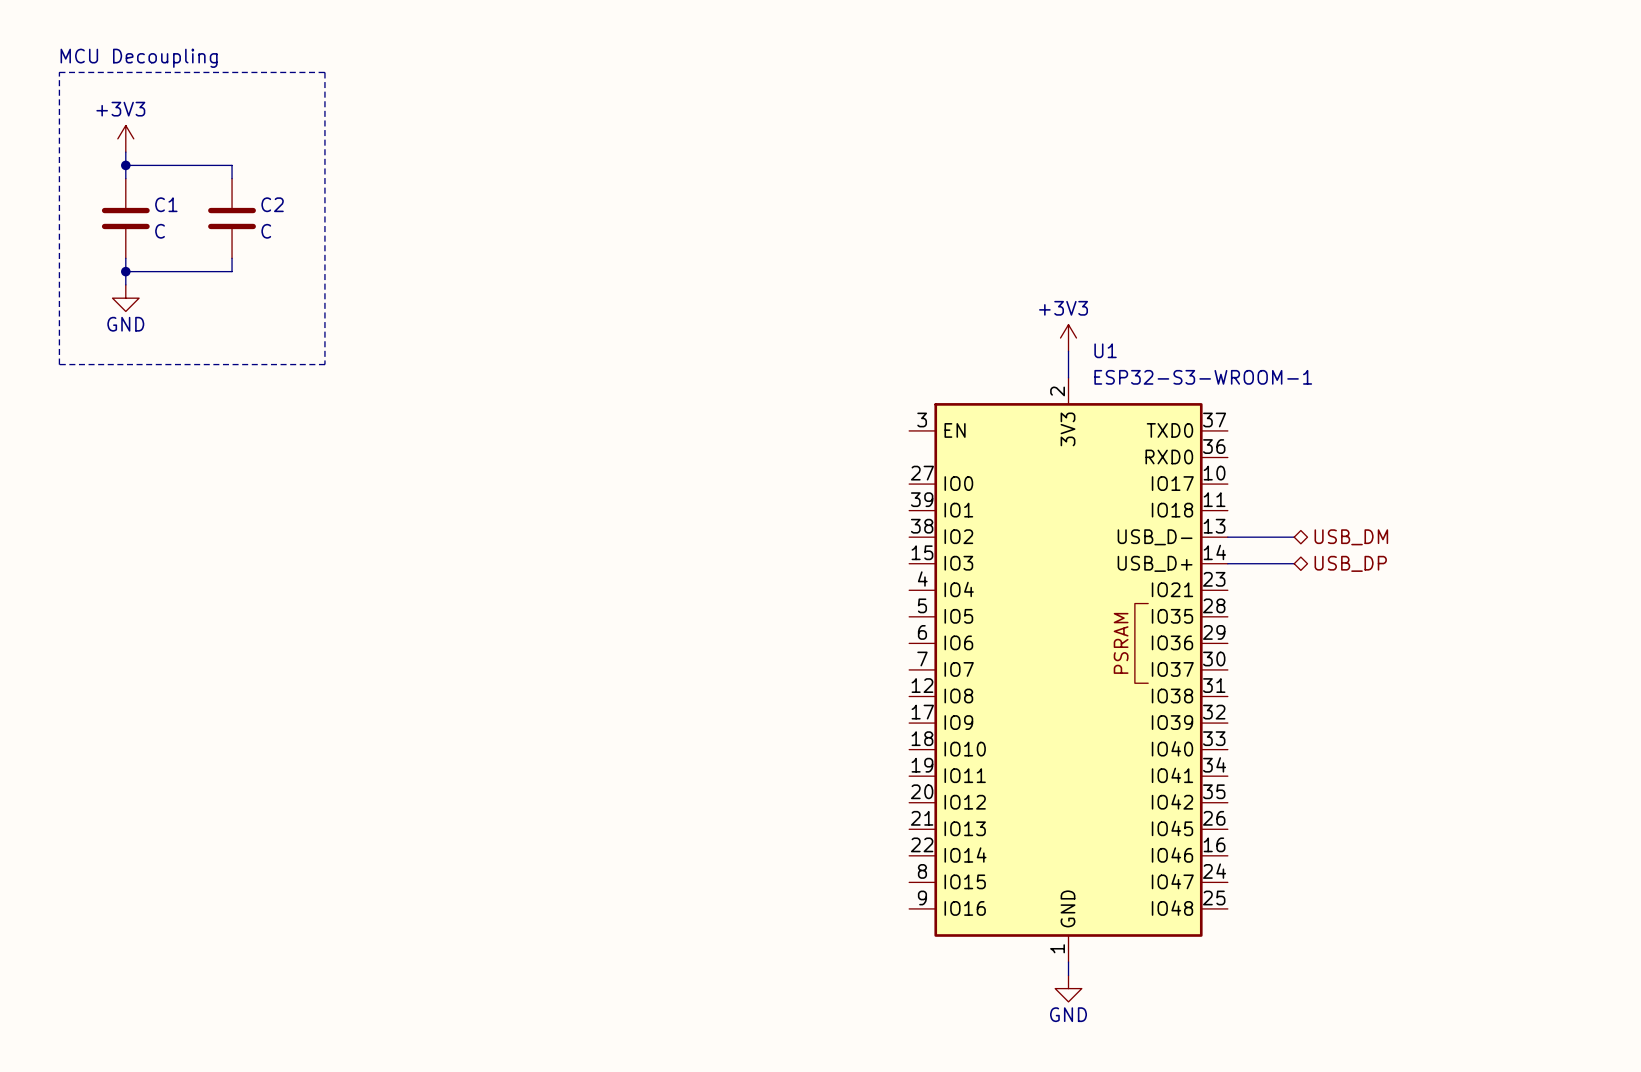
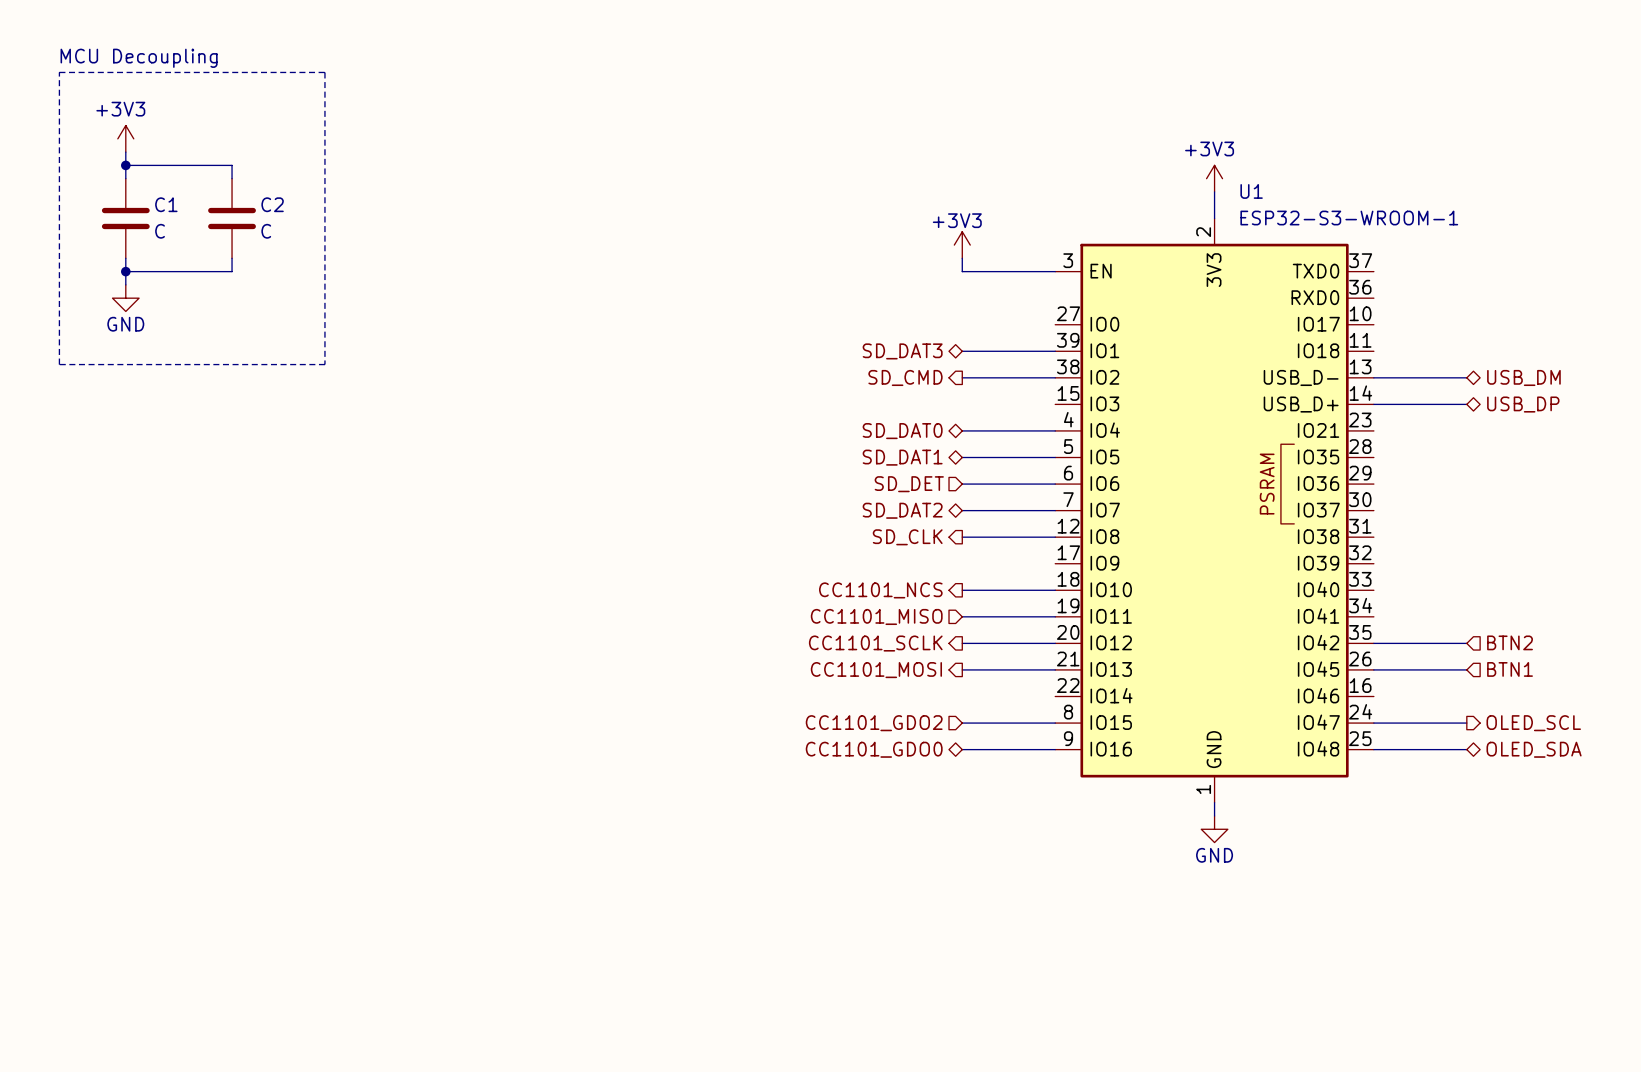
power symbol: none -> +3V3 (1214, 178)
power symbol: none -> +3V3 (962, 245)
wire: none -> (962, 258) (962, 271) (1055, 271)
power symbol: +3V3 (1068, 338) -> none
hierarchical label: none -> SD_DAT3 (902, 351)
wire: none -> (962, 351) (1055, 351)
wire: (1068, 351) (1068, 377) -> (1214, 191) (1214, 218)
hierarchical label: none -> SD_CMD (905, 377)
wire: none -> (962, 377) (1055, 377)
wire: none -> (1373, 377) (1466, 377)
wire: none -> (1373, 404) (1466, 404)
hierarchical label: none -> SD_DAT0 (902, 431)
hierarchical label: none -> SD_DAT1 (902, 457)
hierarchical label: none -> SD_DET (909, 484)
hierarchical label: none -> SD_DAT2 (902, 510)
hierarchical label: none -> SD_CLK (907, 537)
hierarchical label position: USB_DM (1351, 537) -> USB_DM (1523, 377)
hierarchical label position: USB_DP (1350, 563) -> USB_DP (1523, 404)
hierarchical label: none -> CC1101_NCS (880, 590)
hierarchical label: none -> CC1101_MISO (876, 616)
hierarchical label: none -> BTN2 (1510, 642)
hierarchical label: none -> CC1101_SCLK (875, 643)
wire: none -> (1373, 643) (1466, 643)
U1 position: (1068, 669) -> (1214, 510)
wire: none -> (1373, 669) (1466, 669)
hierarchical label: none -> BTN1 (1510, 669)
hierarchical label: none -> CC1101_MOSI (876, 670)
hierarchical label: none -> CC1101_GDO2 (874, 723)
wire: none -> (1373, 723) (1466, 723)
hierarchical label: none -> OLED_SCL (1533, 723)
hierarchical label: none -> CC1101_GDO0 (874, 749)
wire: none -> (1373, 749) (1466, 749)
hierarchical label: none -> OLED_SDA (1534, 749)
wire: (1068, 962) (1068, 975) -> (1214, 802) (1214, 816)
power symbol position: GND (1068, 988) -> GND (1214, 829)

